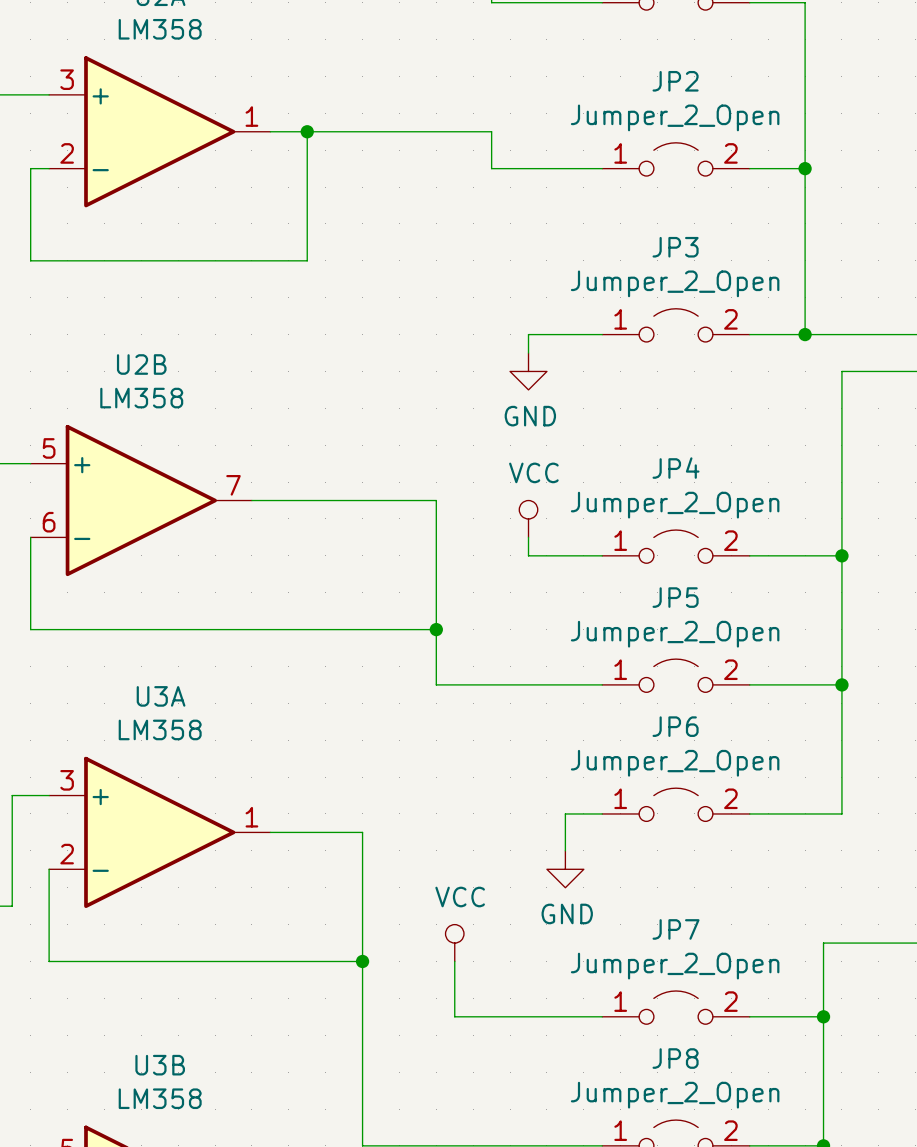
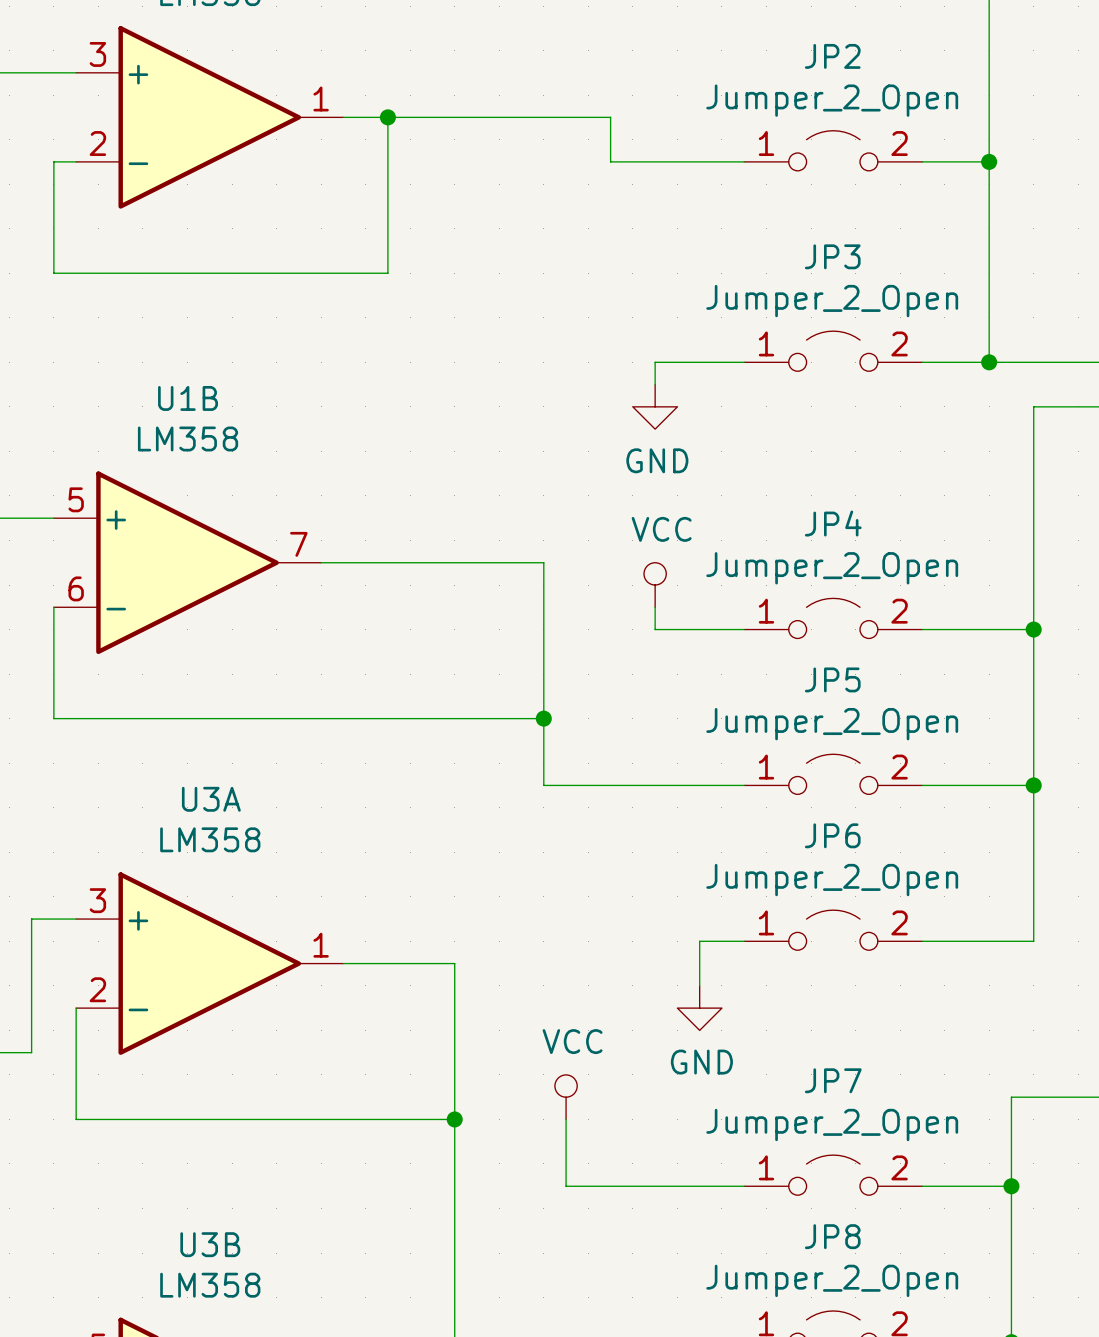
U2B name: U2B (141, 364) -> U1B (188, 398)

